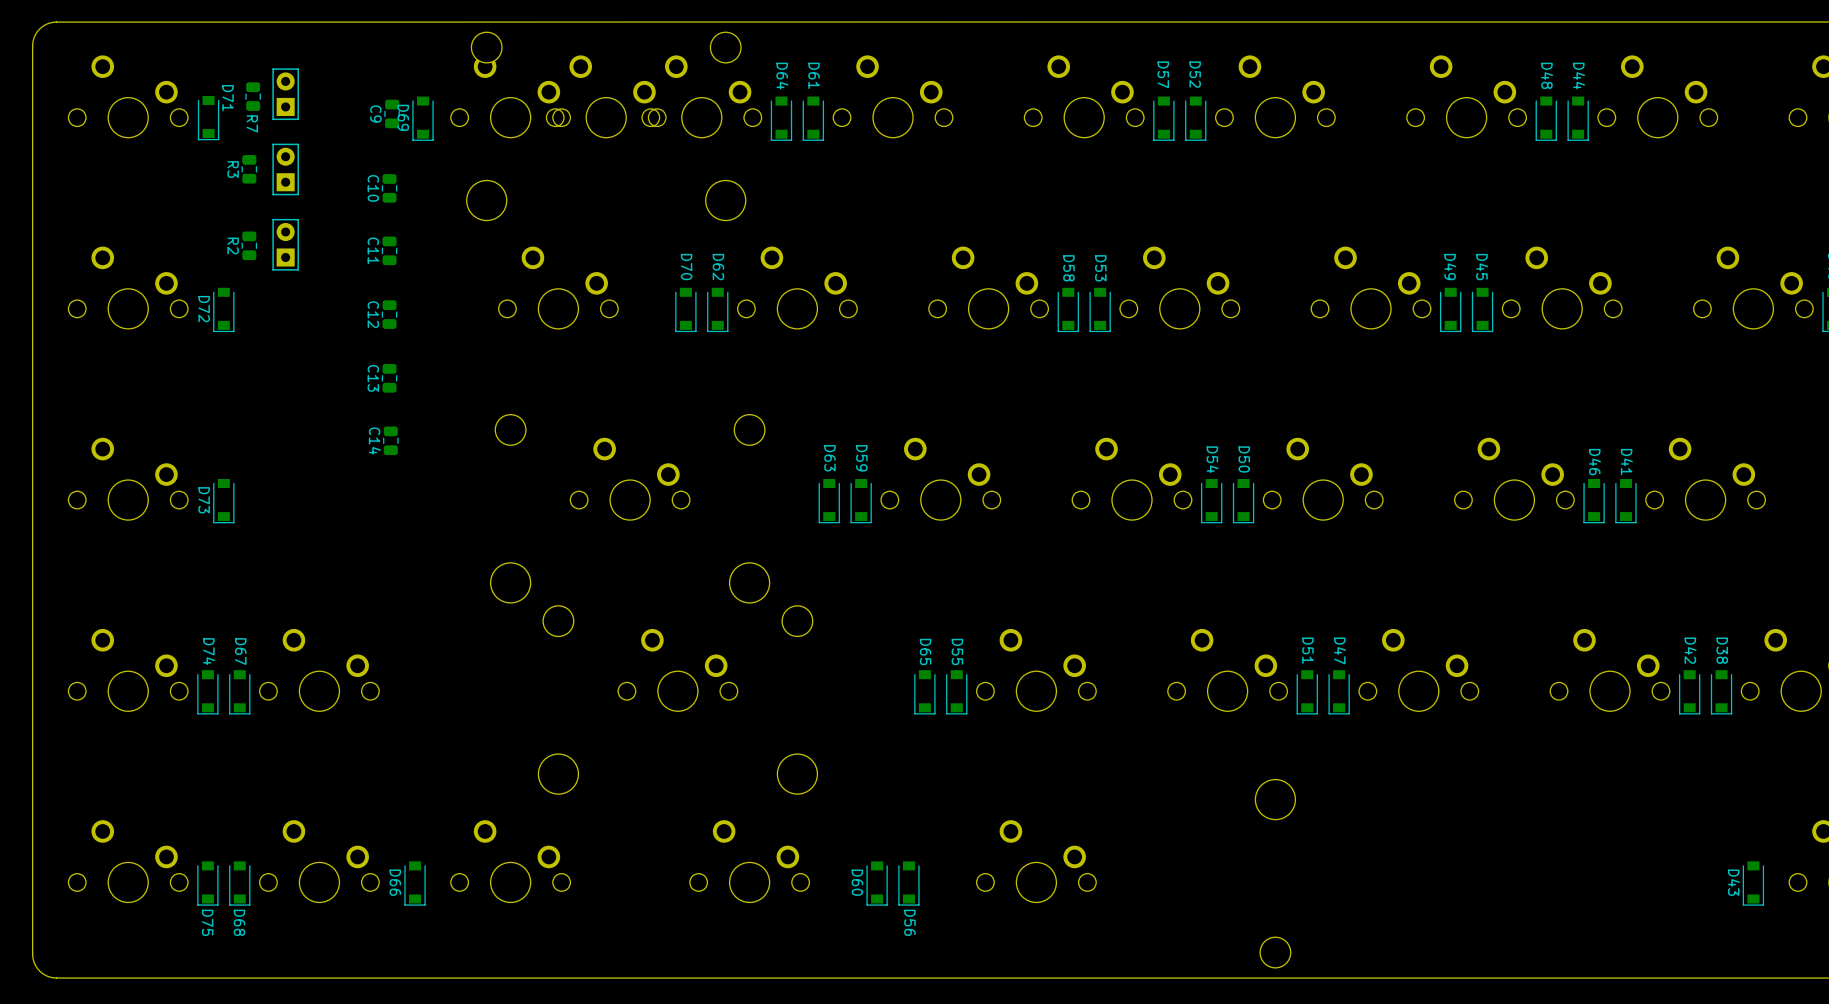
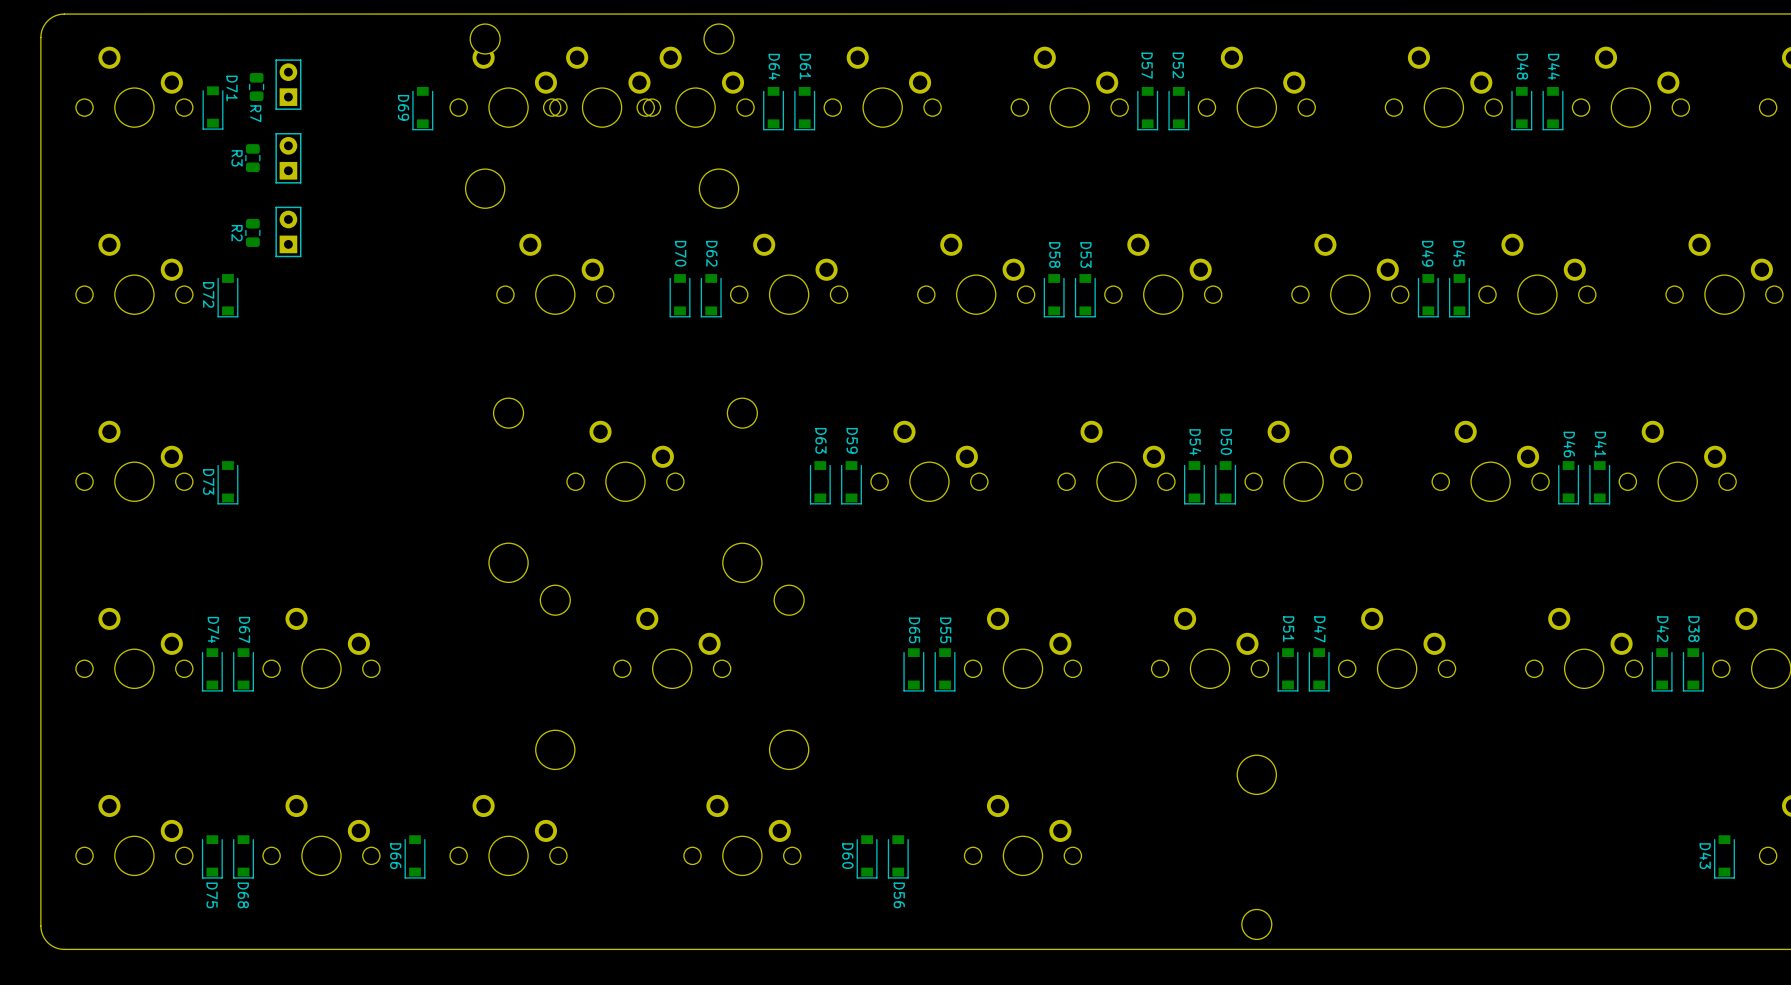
C9: (392, 113) -> none
C10: (389, 188) -> none
C11: (389, 250) -> none
C12: (389, 314) -> none
C13: (389, 378) -> none
C14: (390, 440) -> none

